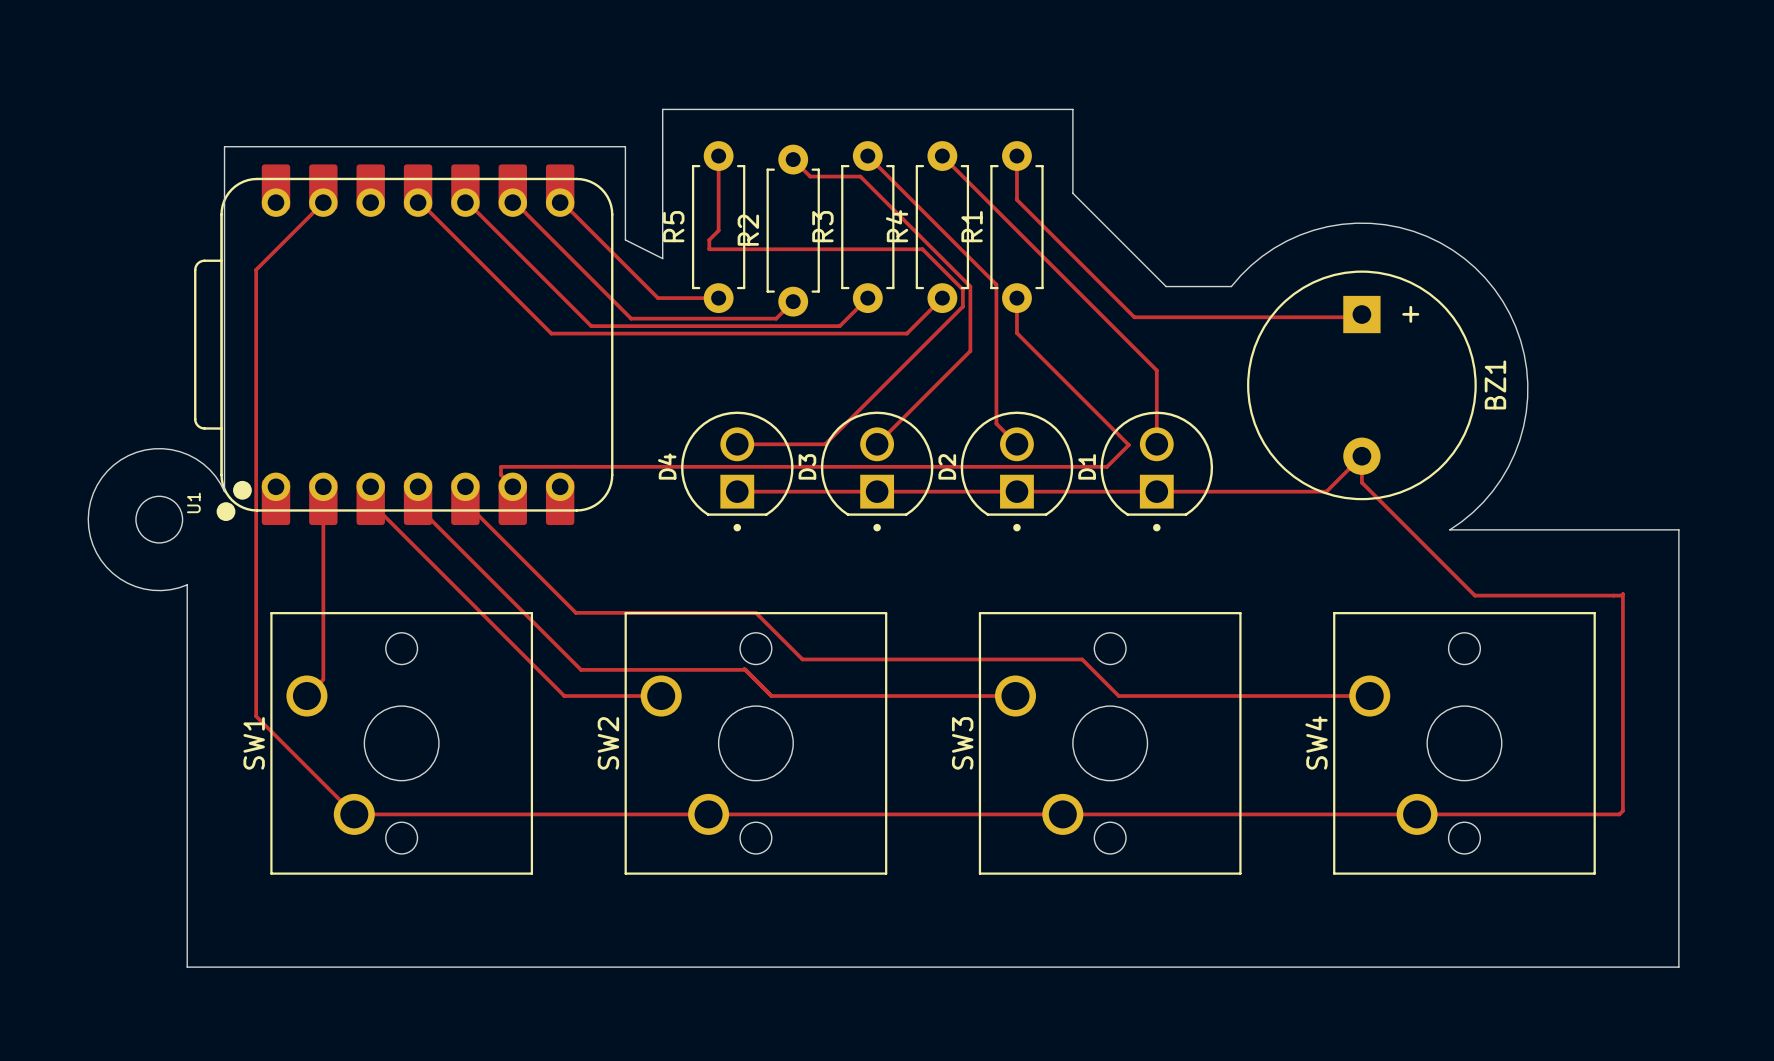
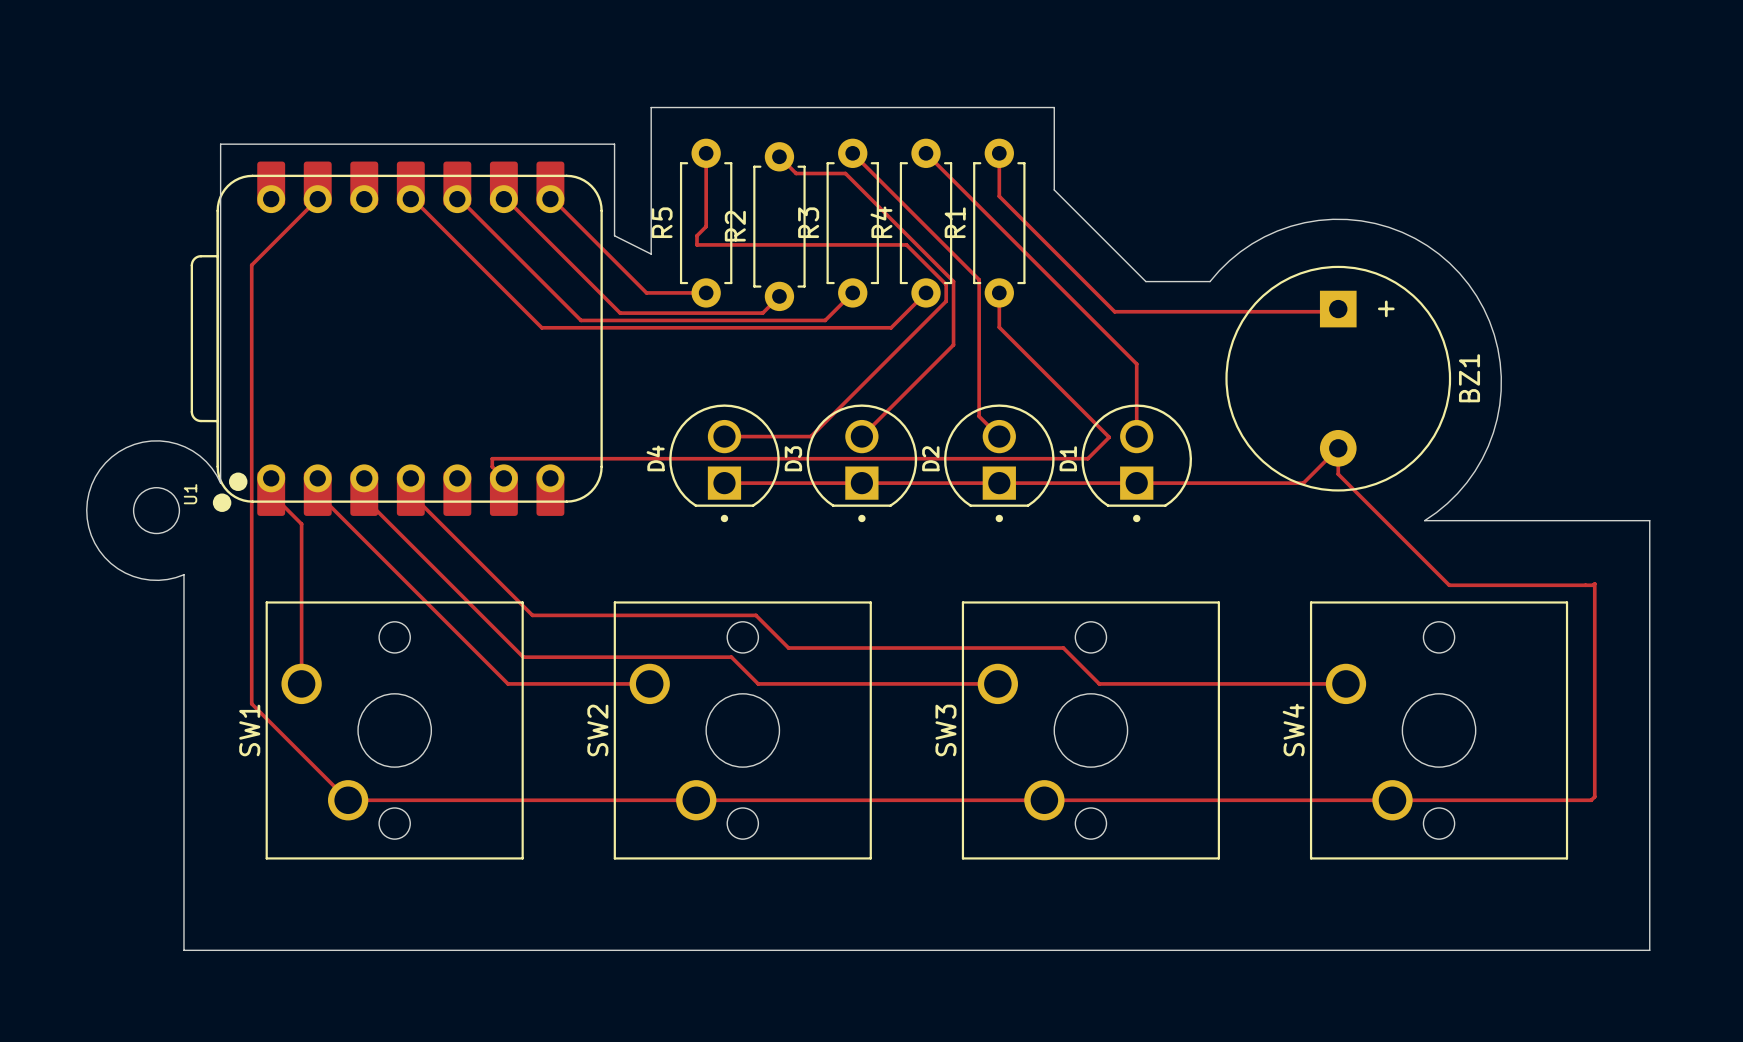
top track: (418, 486) (418, 506) (581, 669) (745, 669) -> none
top track: (323, 502) (323, 679) (306, 696) -> (271, 493) (301, 524) (301, 683)
top track: (370, 502) (564, 696) -> (317, 493) (508, 683) (554, 683)
top track: (465, 502) (575, 612) (755, 612) (769, 626) -> (410, 493) (532, 615) (755, 615)
top track: none -> (364, 498) (523, 657) (731, 657)

